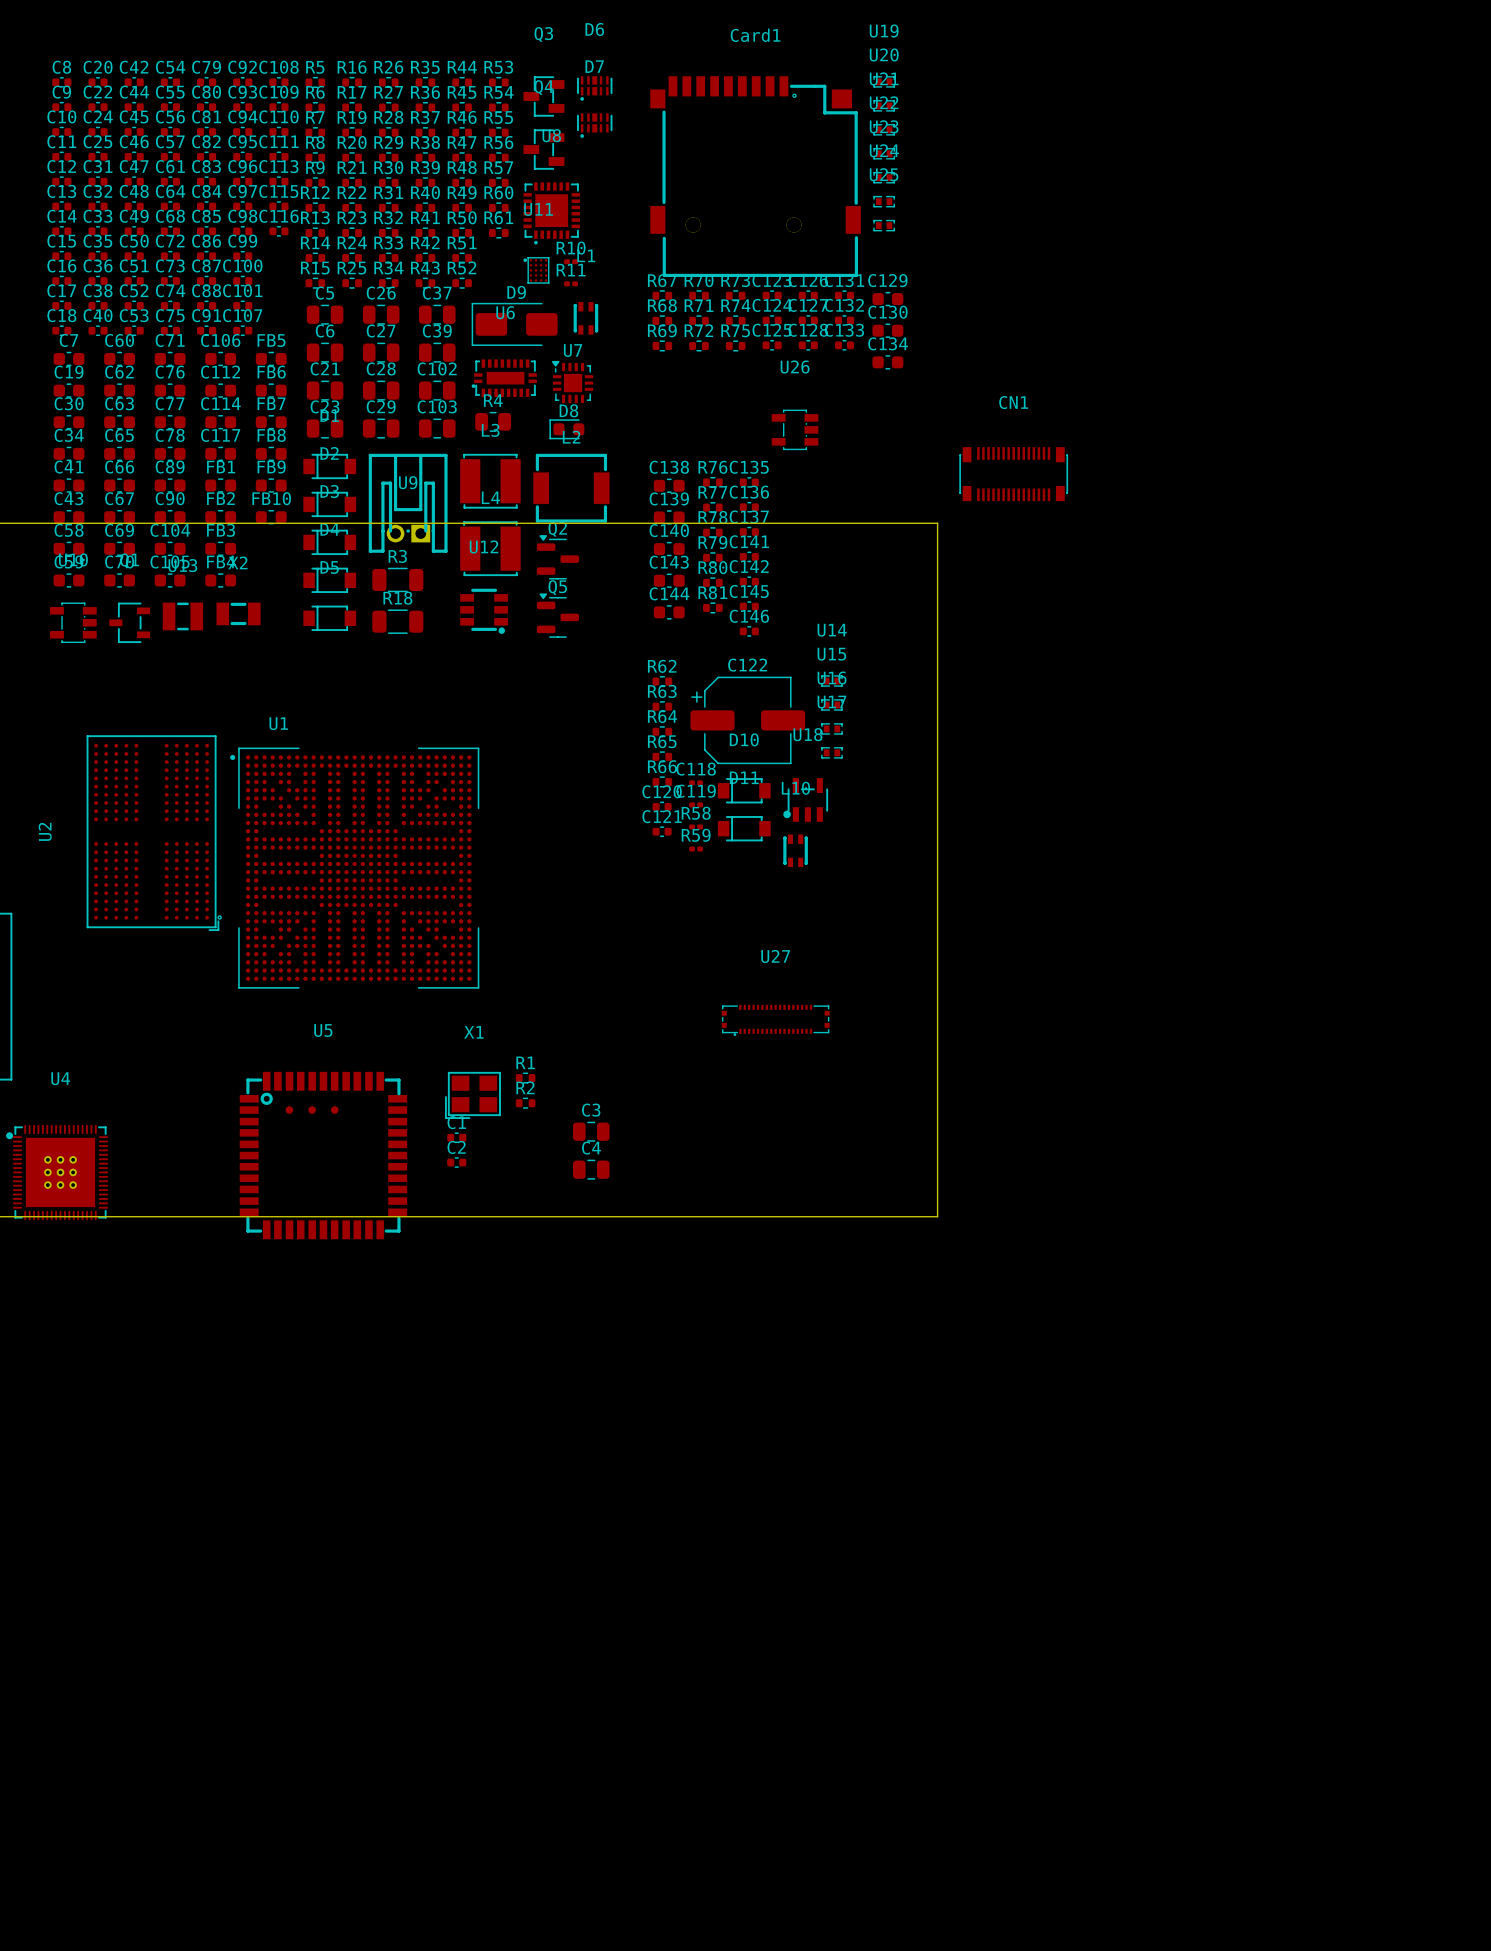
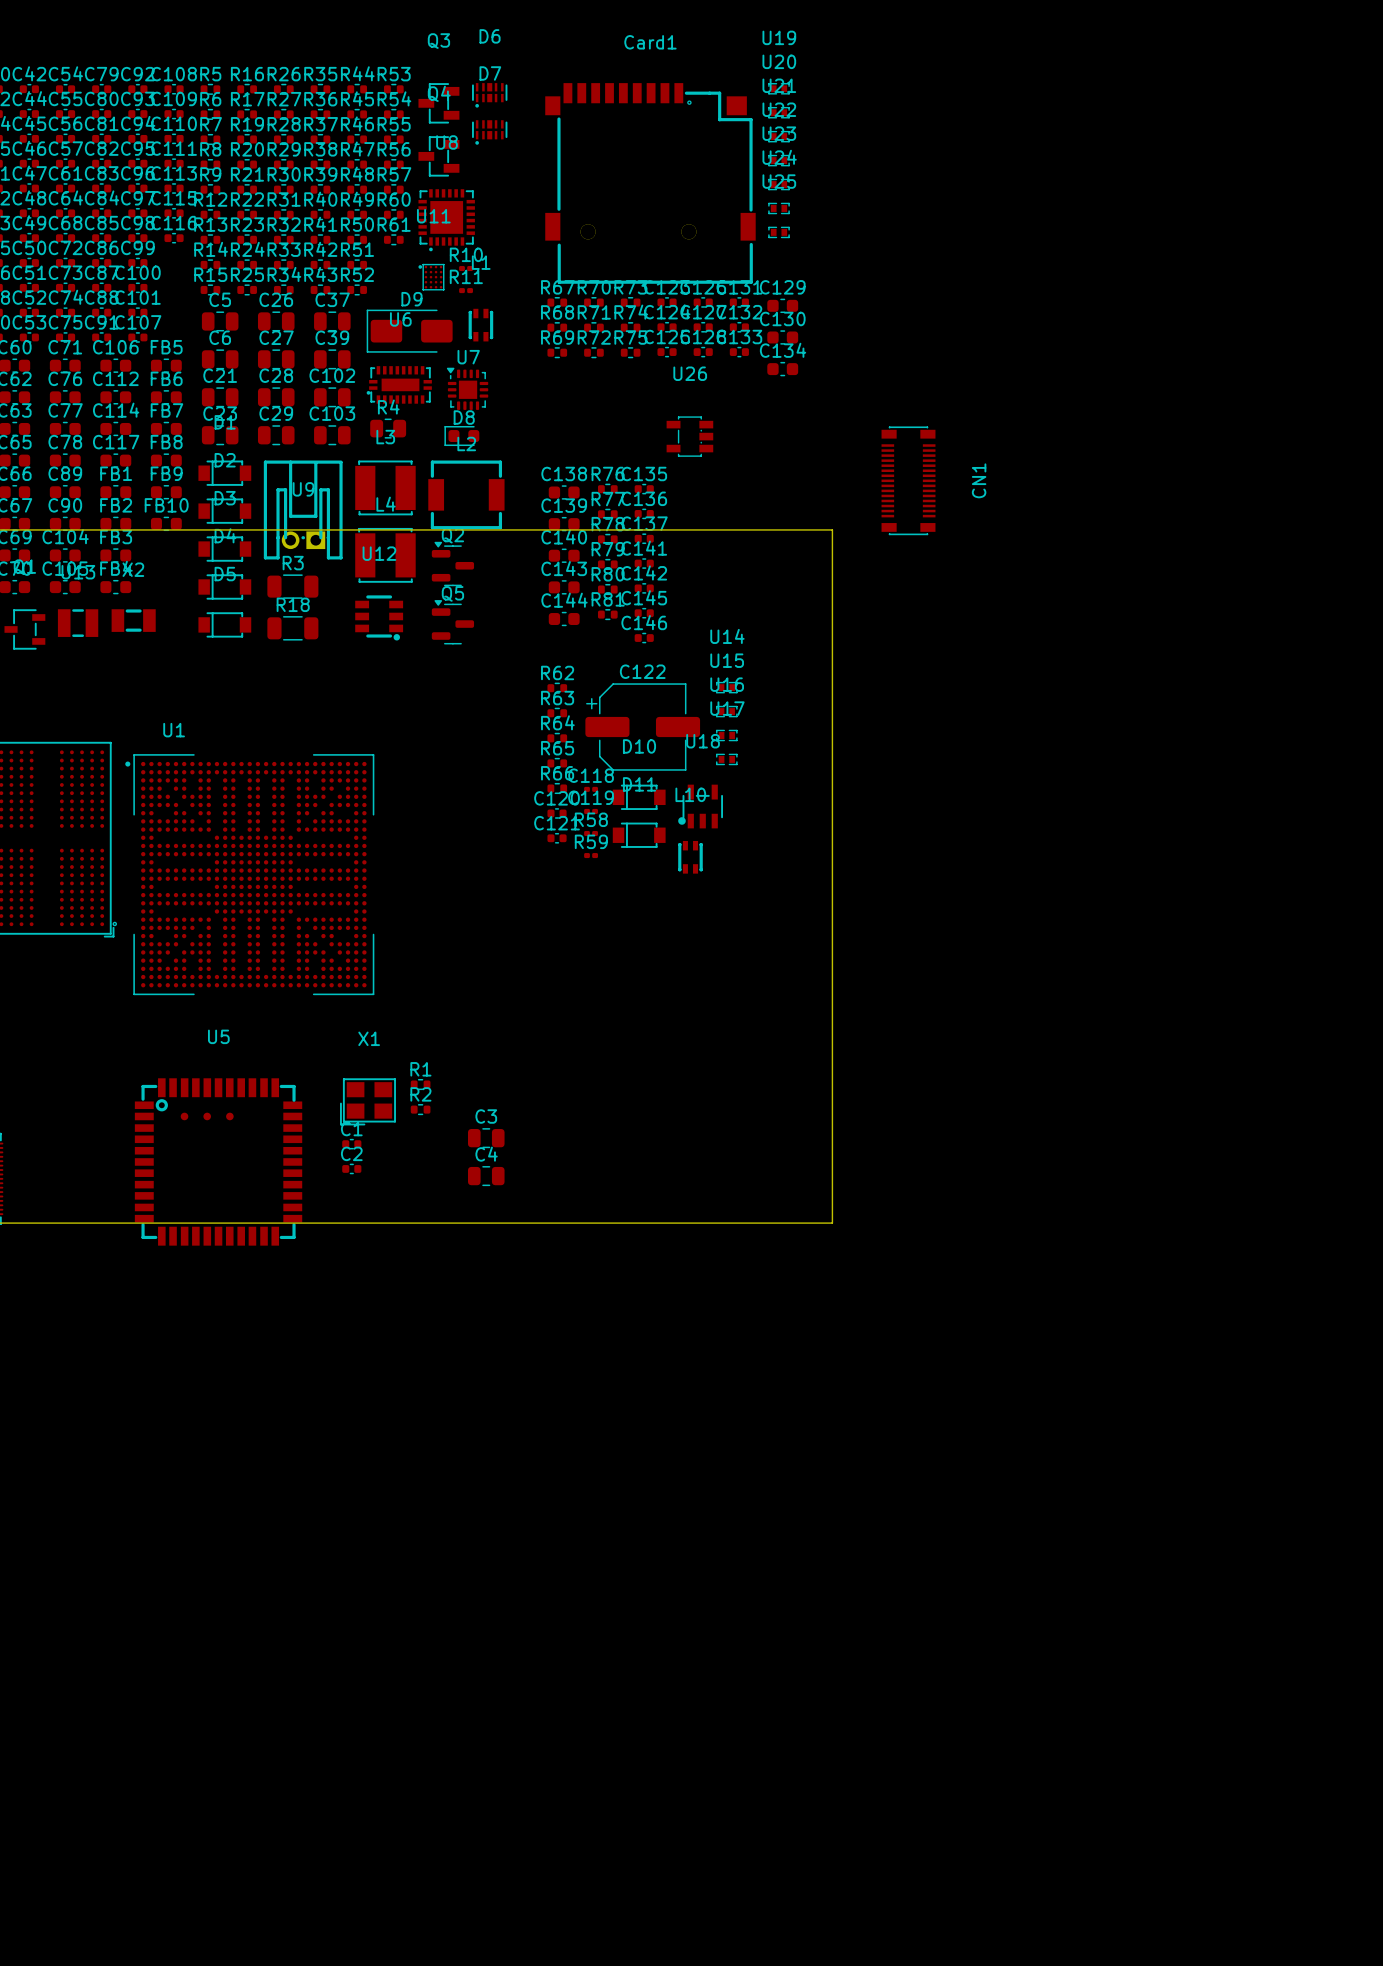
CN1 rotation: 0° (1013, 474) -> 90° clockwise (908, 480)
U27: (775, 1020) -> none

